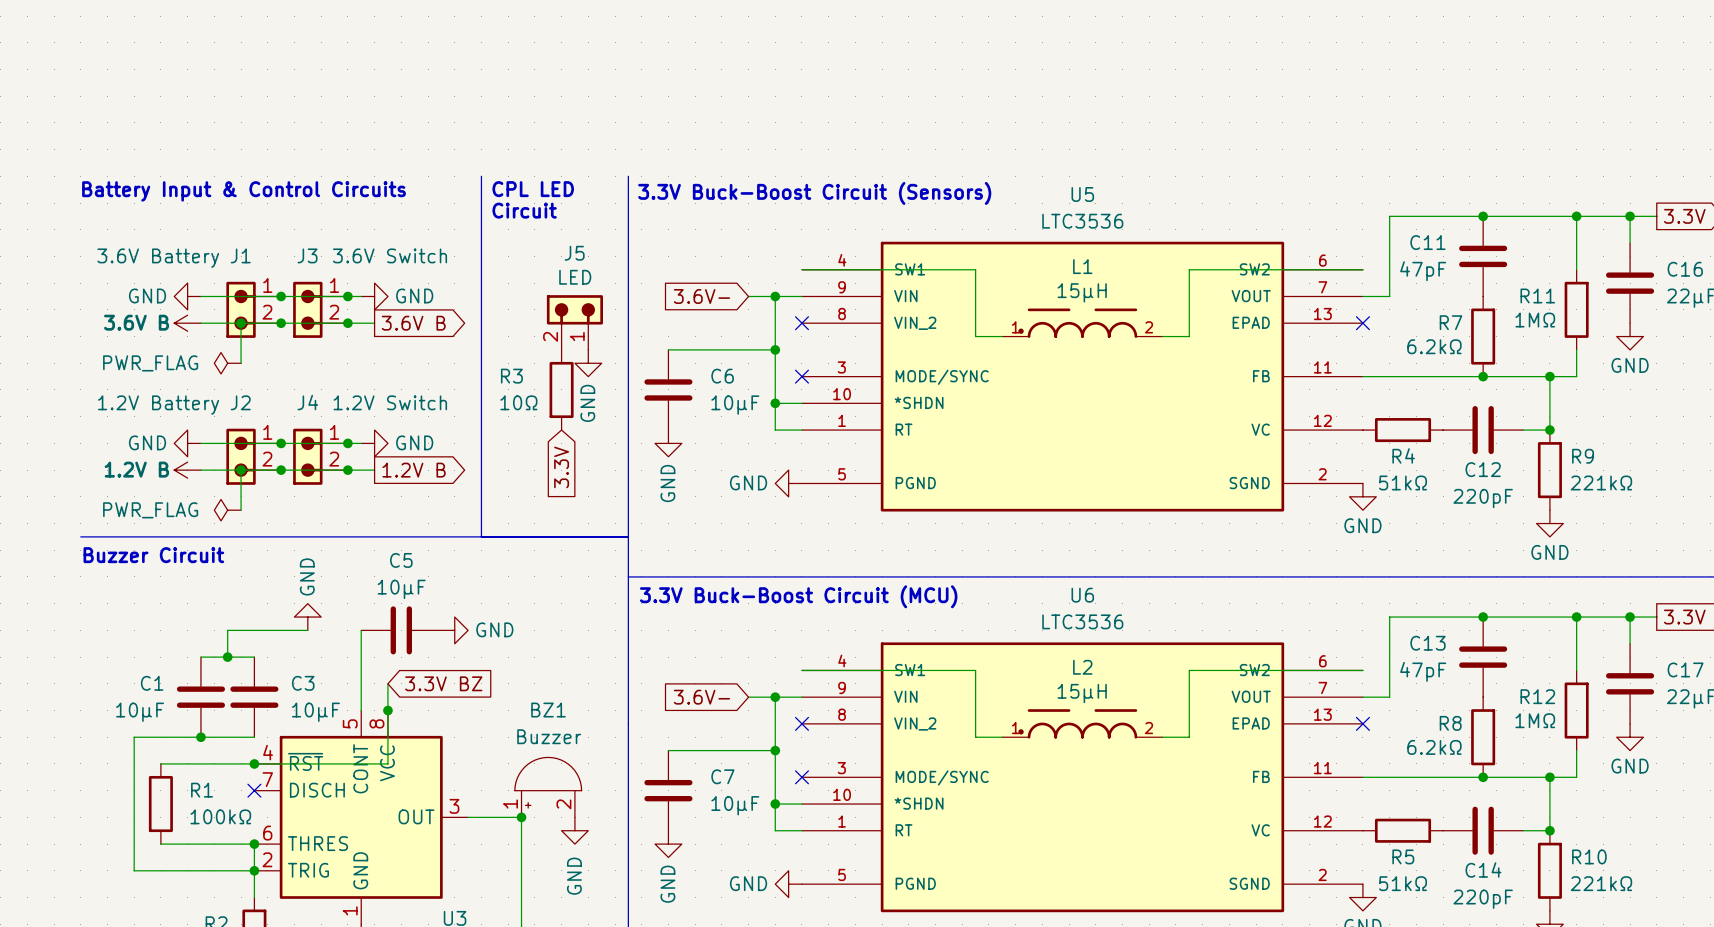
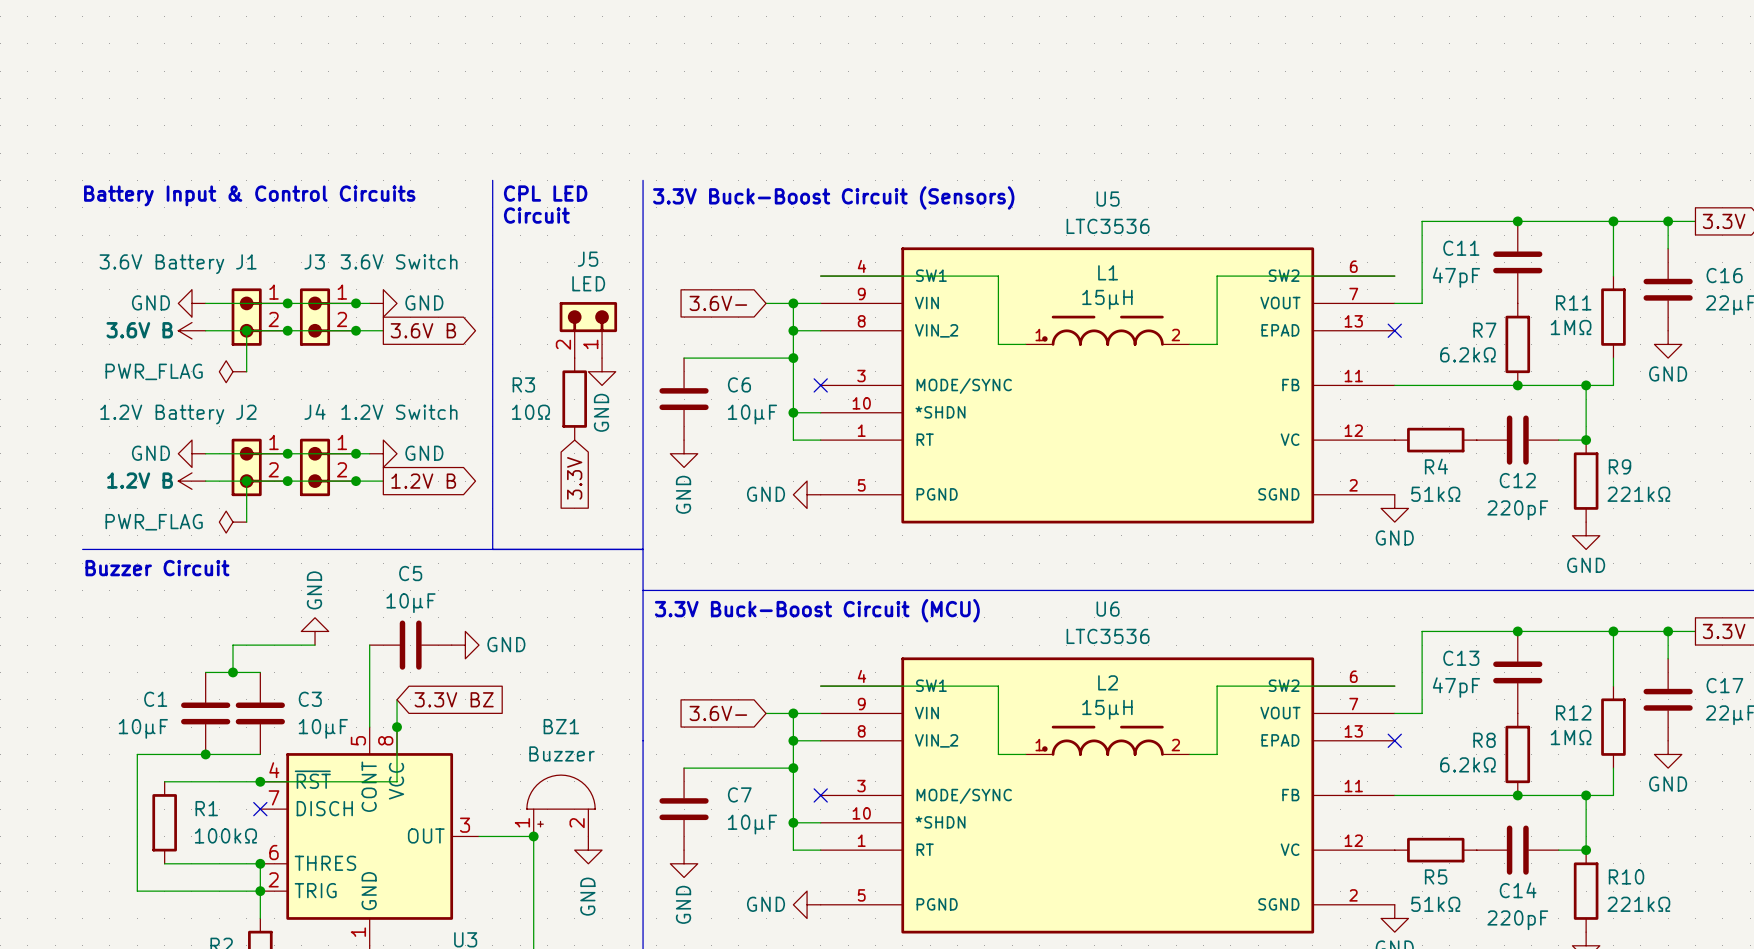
wire: none -> (793, 330) (820, 330)
junction: none -> (793, 330)
no-connect mark: (801, 323) -> none
wire: none -> (793, 740) (820, 740)
junction: none -> (793, 740)
no-connect mark: (801, 723) -> none

